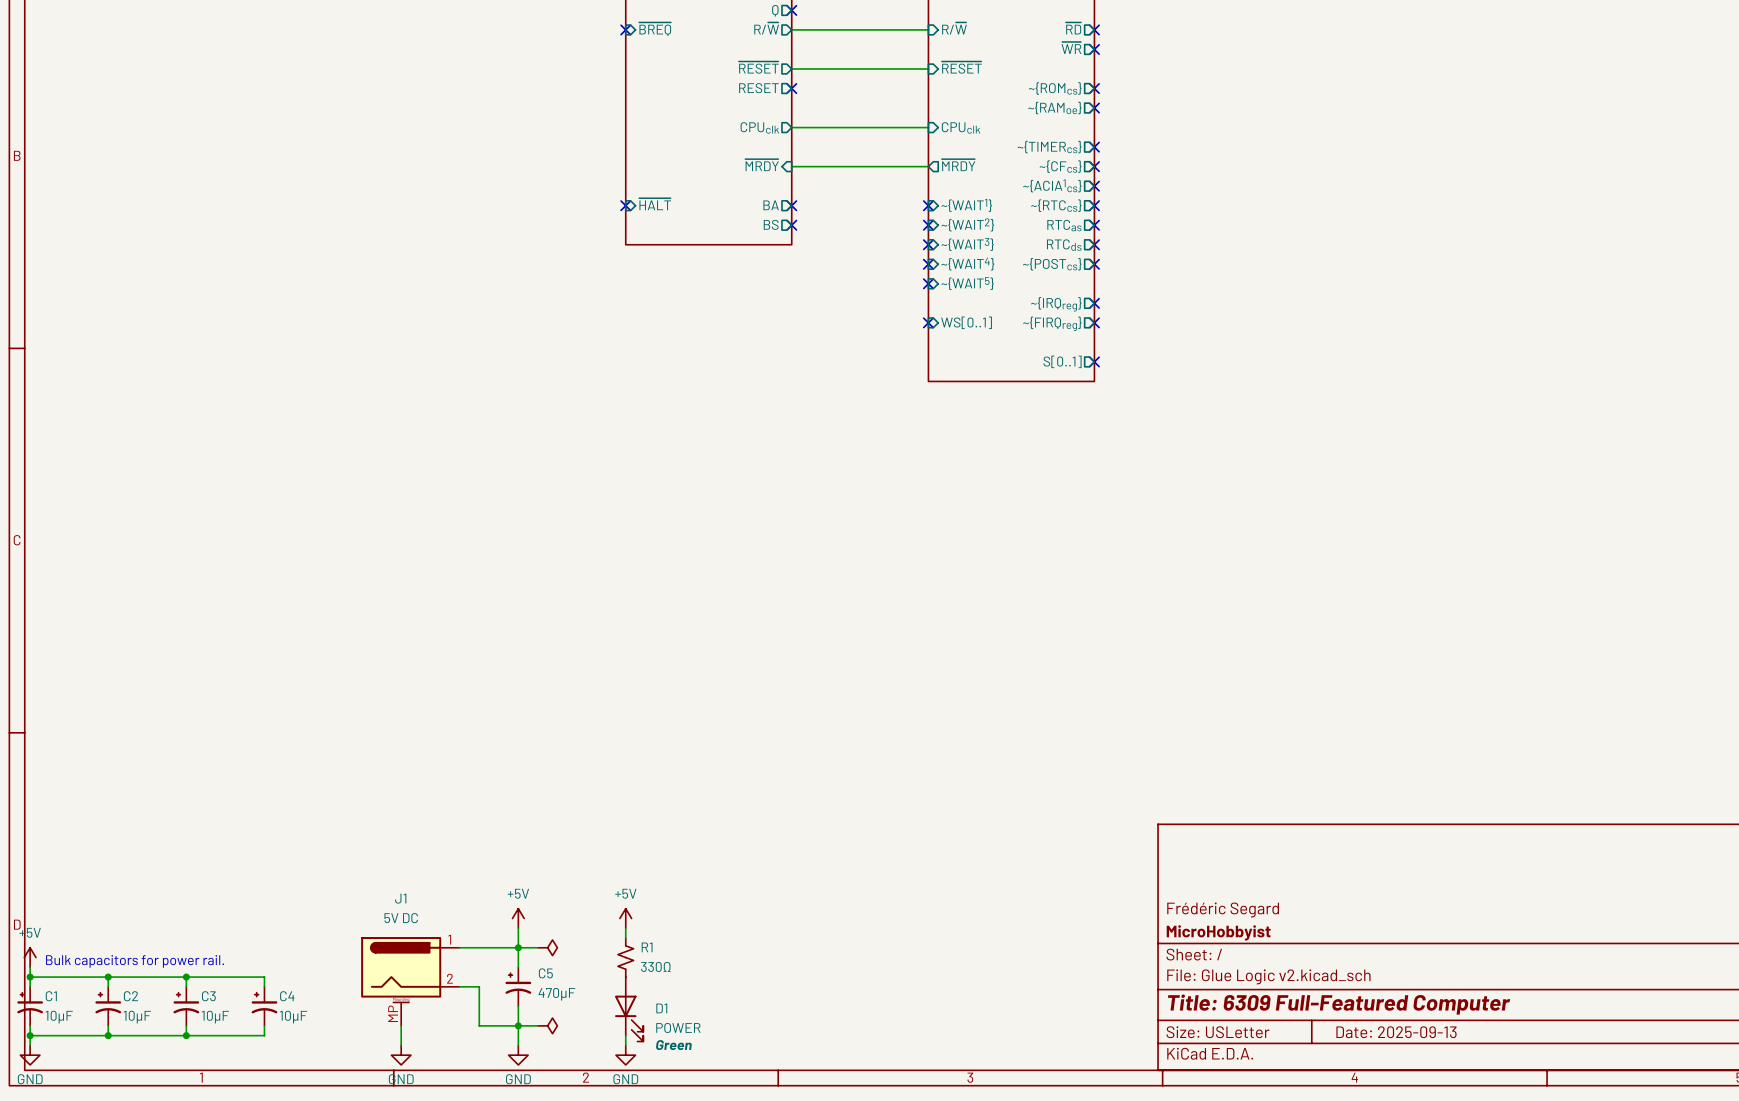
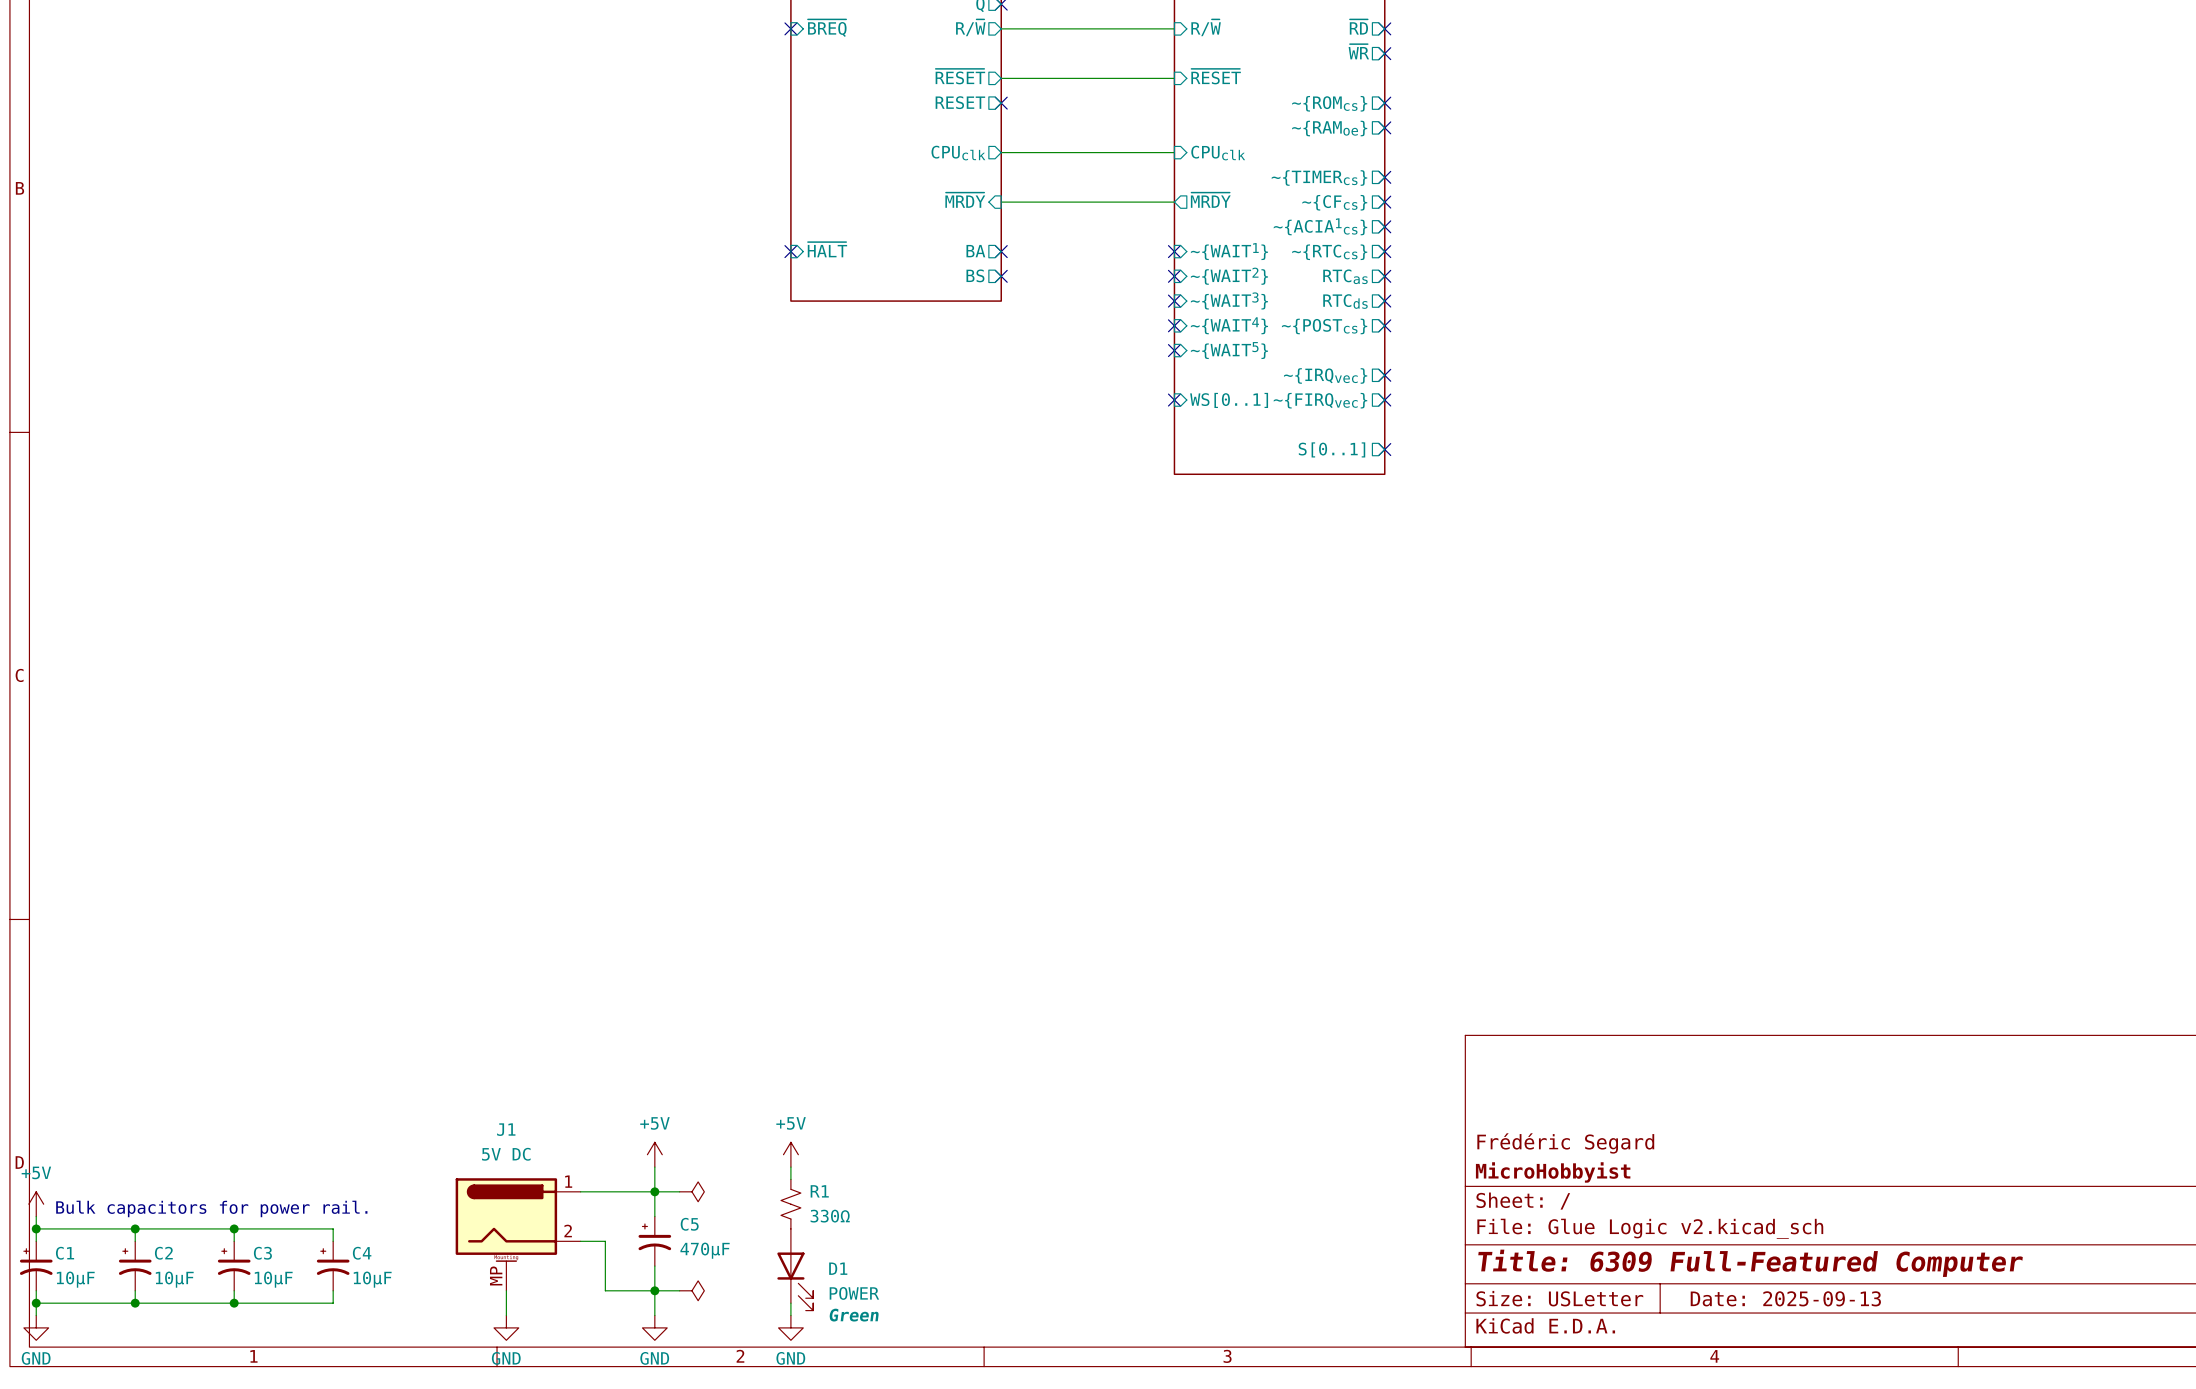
sheet pin: ~{IRQreg} (1056, 304) -> ~{IRQvec} (1325, 375)
sheet pin: ~{FIRQreg} (1052, 323) -> ~{FIRQvec} (1320, 400)

